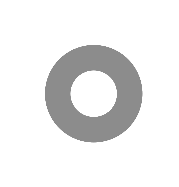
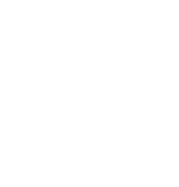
part: (93, 93) -> none

